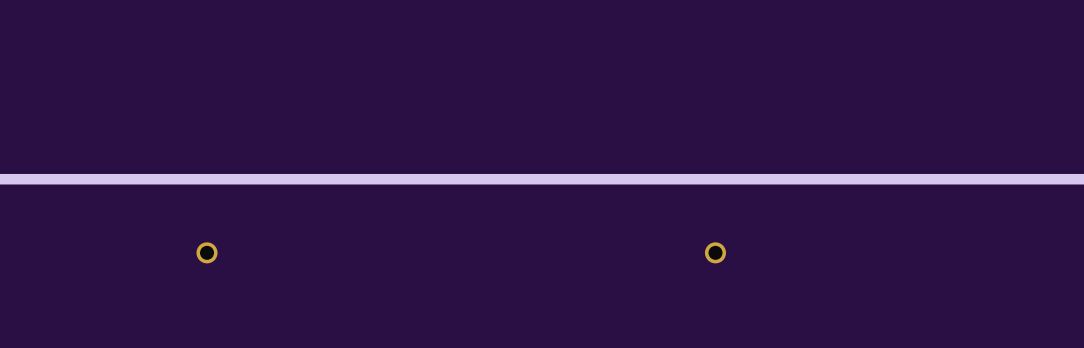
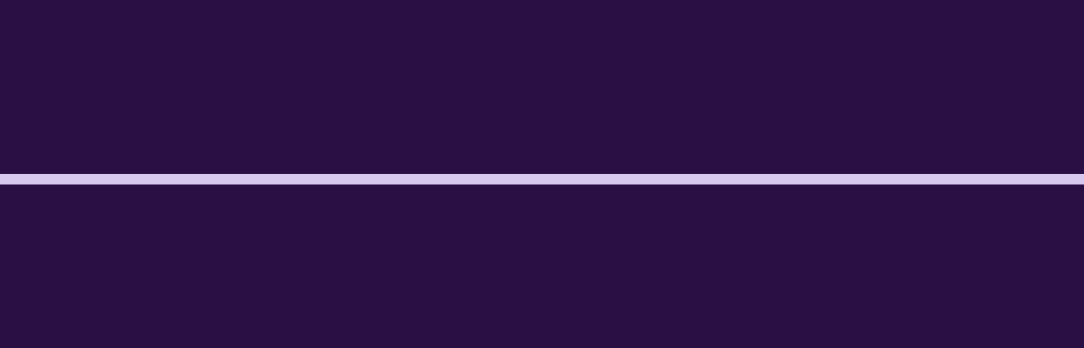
via: (207, 252) -> none
via: (715, 252) -> none

